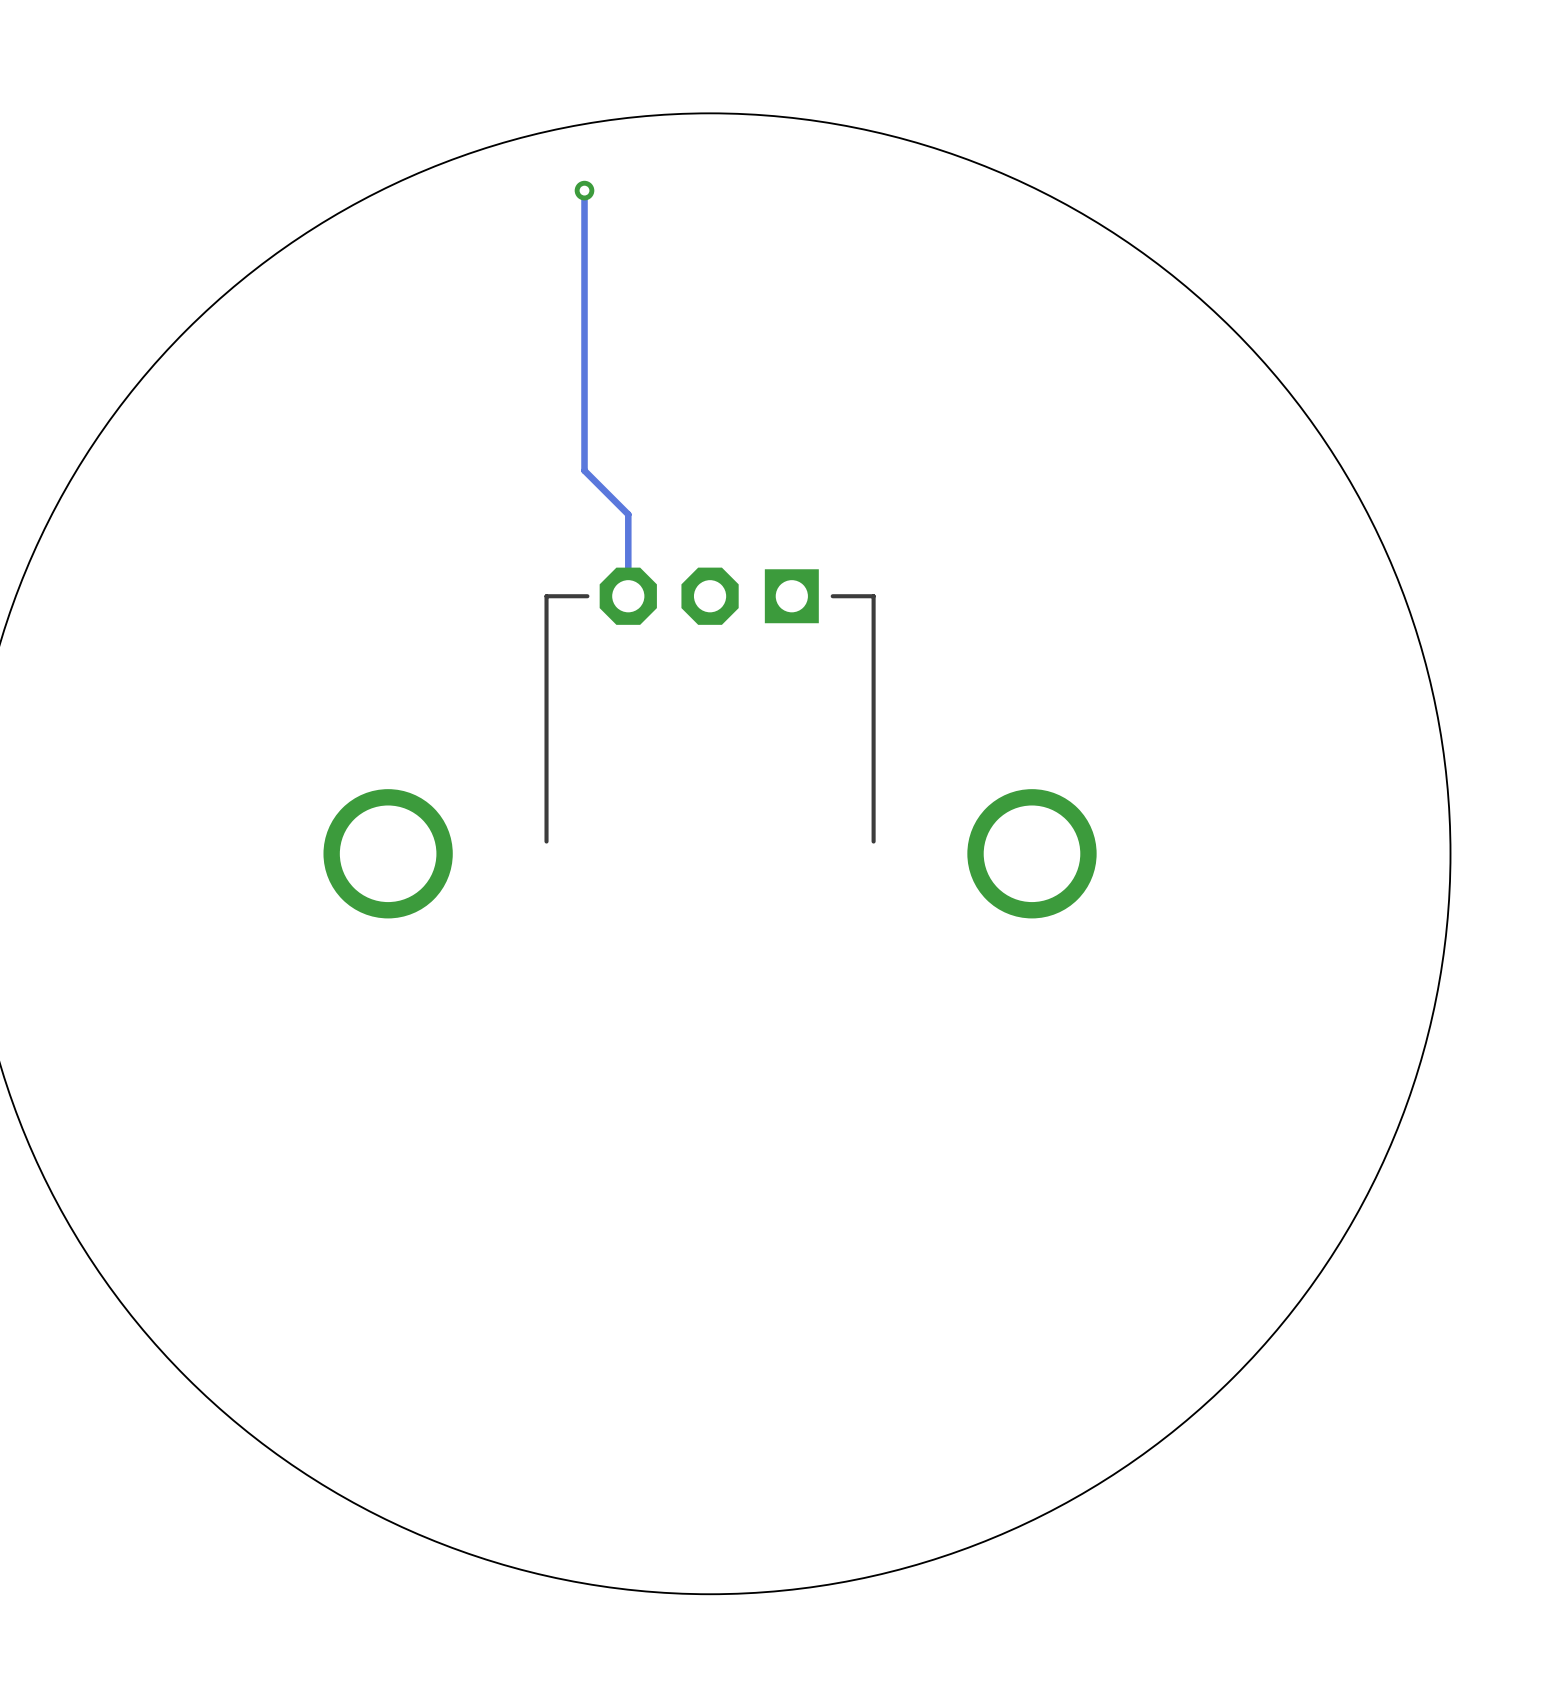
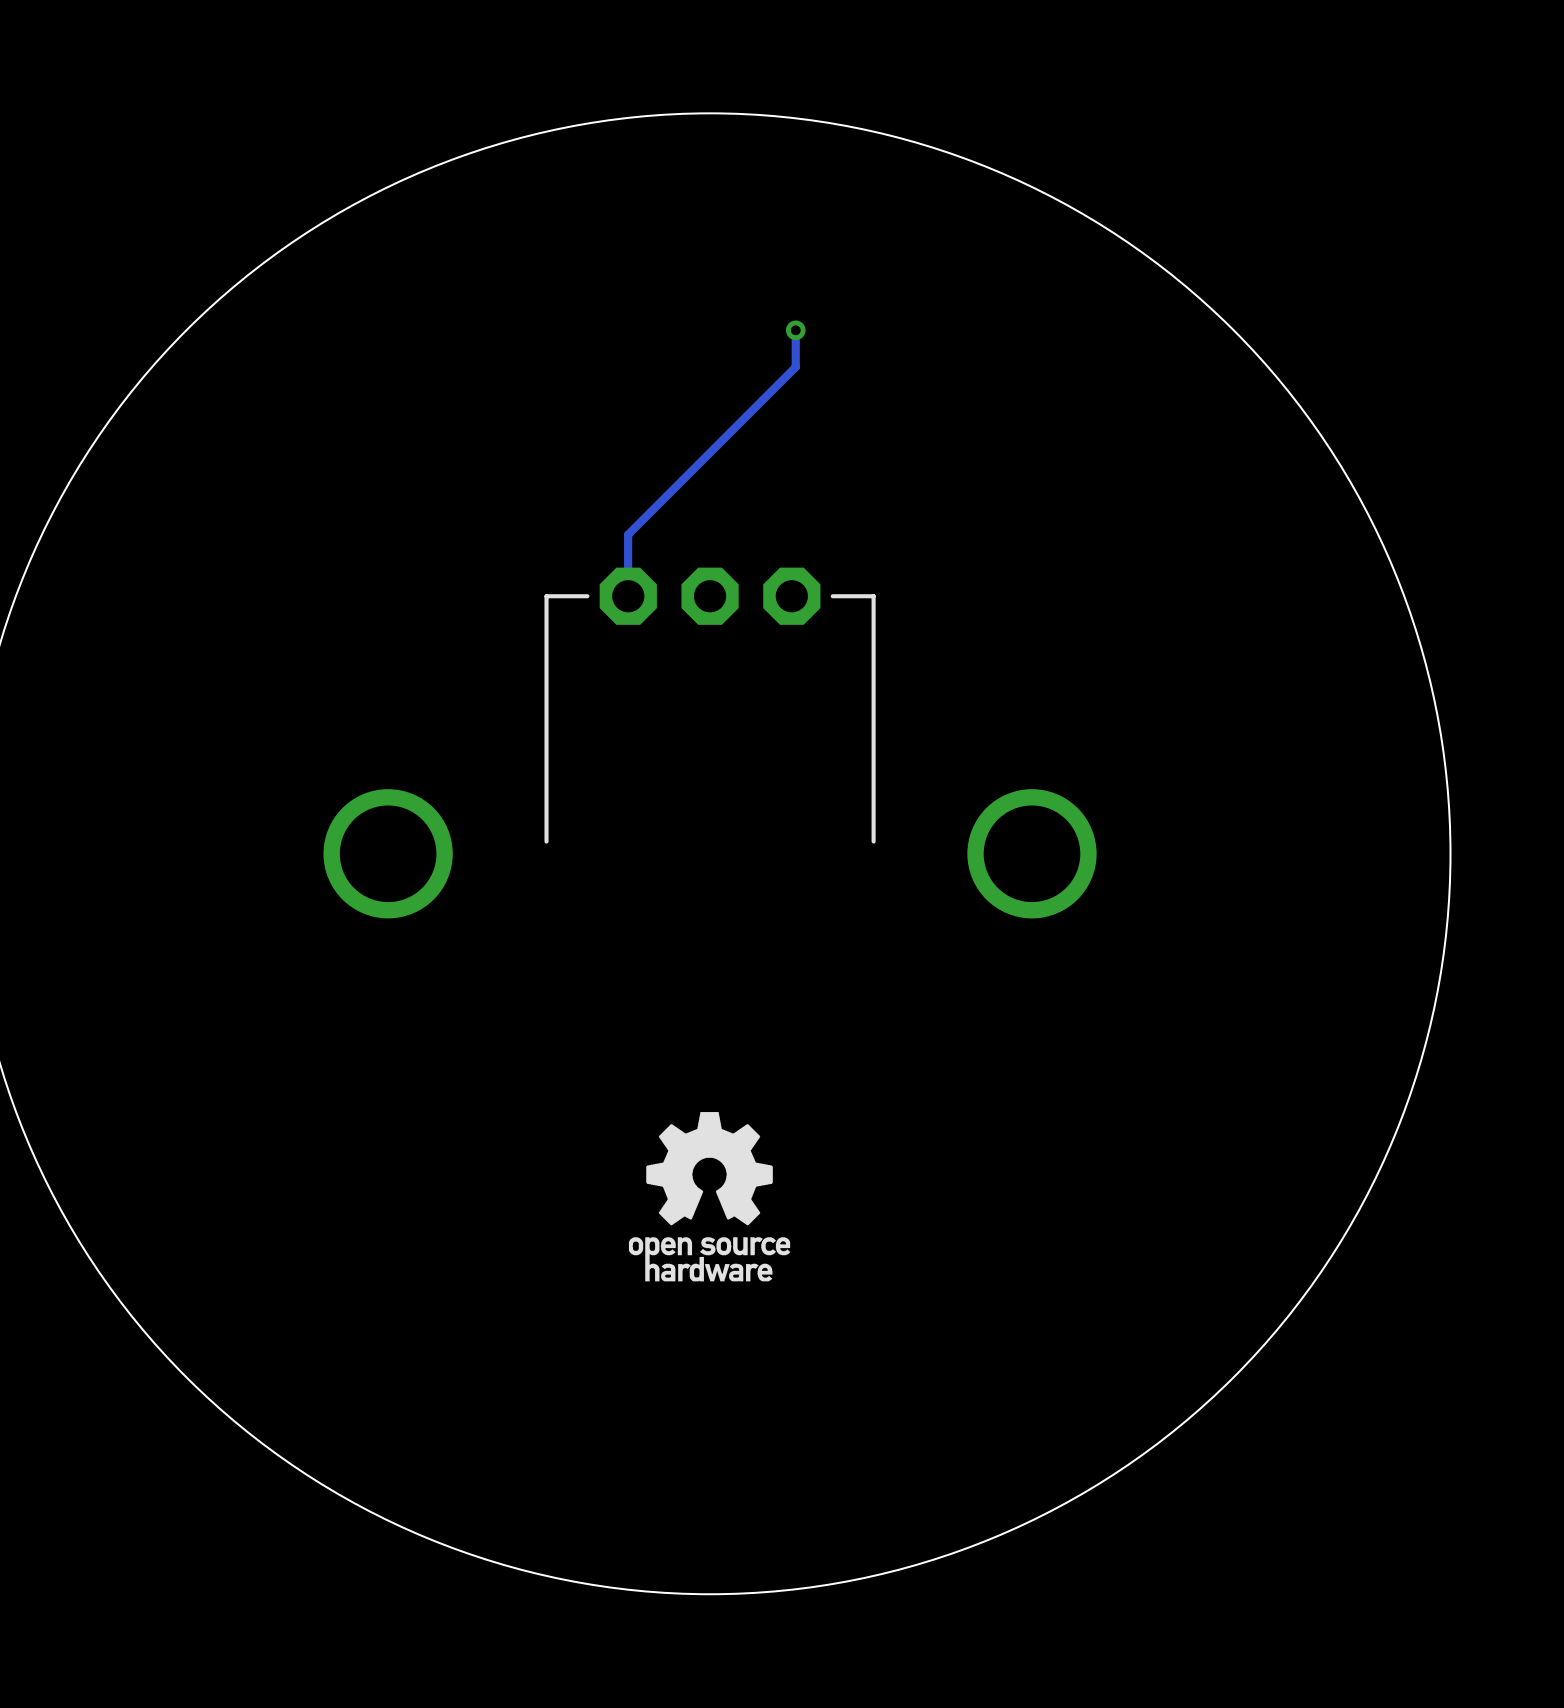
track: (584, 190) (584, 470) (628, 514) (628, 596) -> (795, 330) (795, 367) (628, 534) (628, 596)
via: (584, 190) -> none
via: none -> (795, 330)
part footprint: [544, 567, 876, 844] -> [544, 567, 876, 844]
drawing: none -> [628, 1112, 791, 1282]

